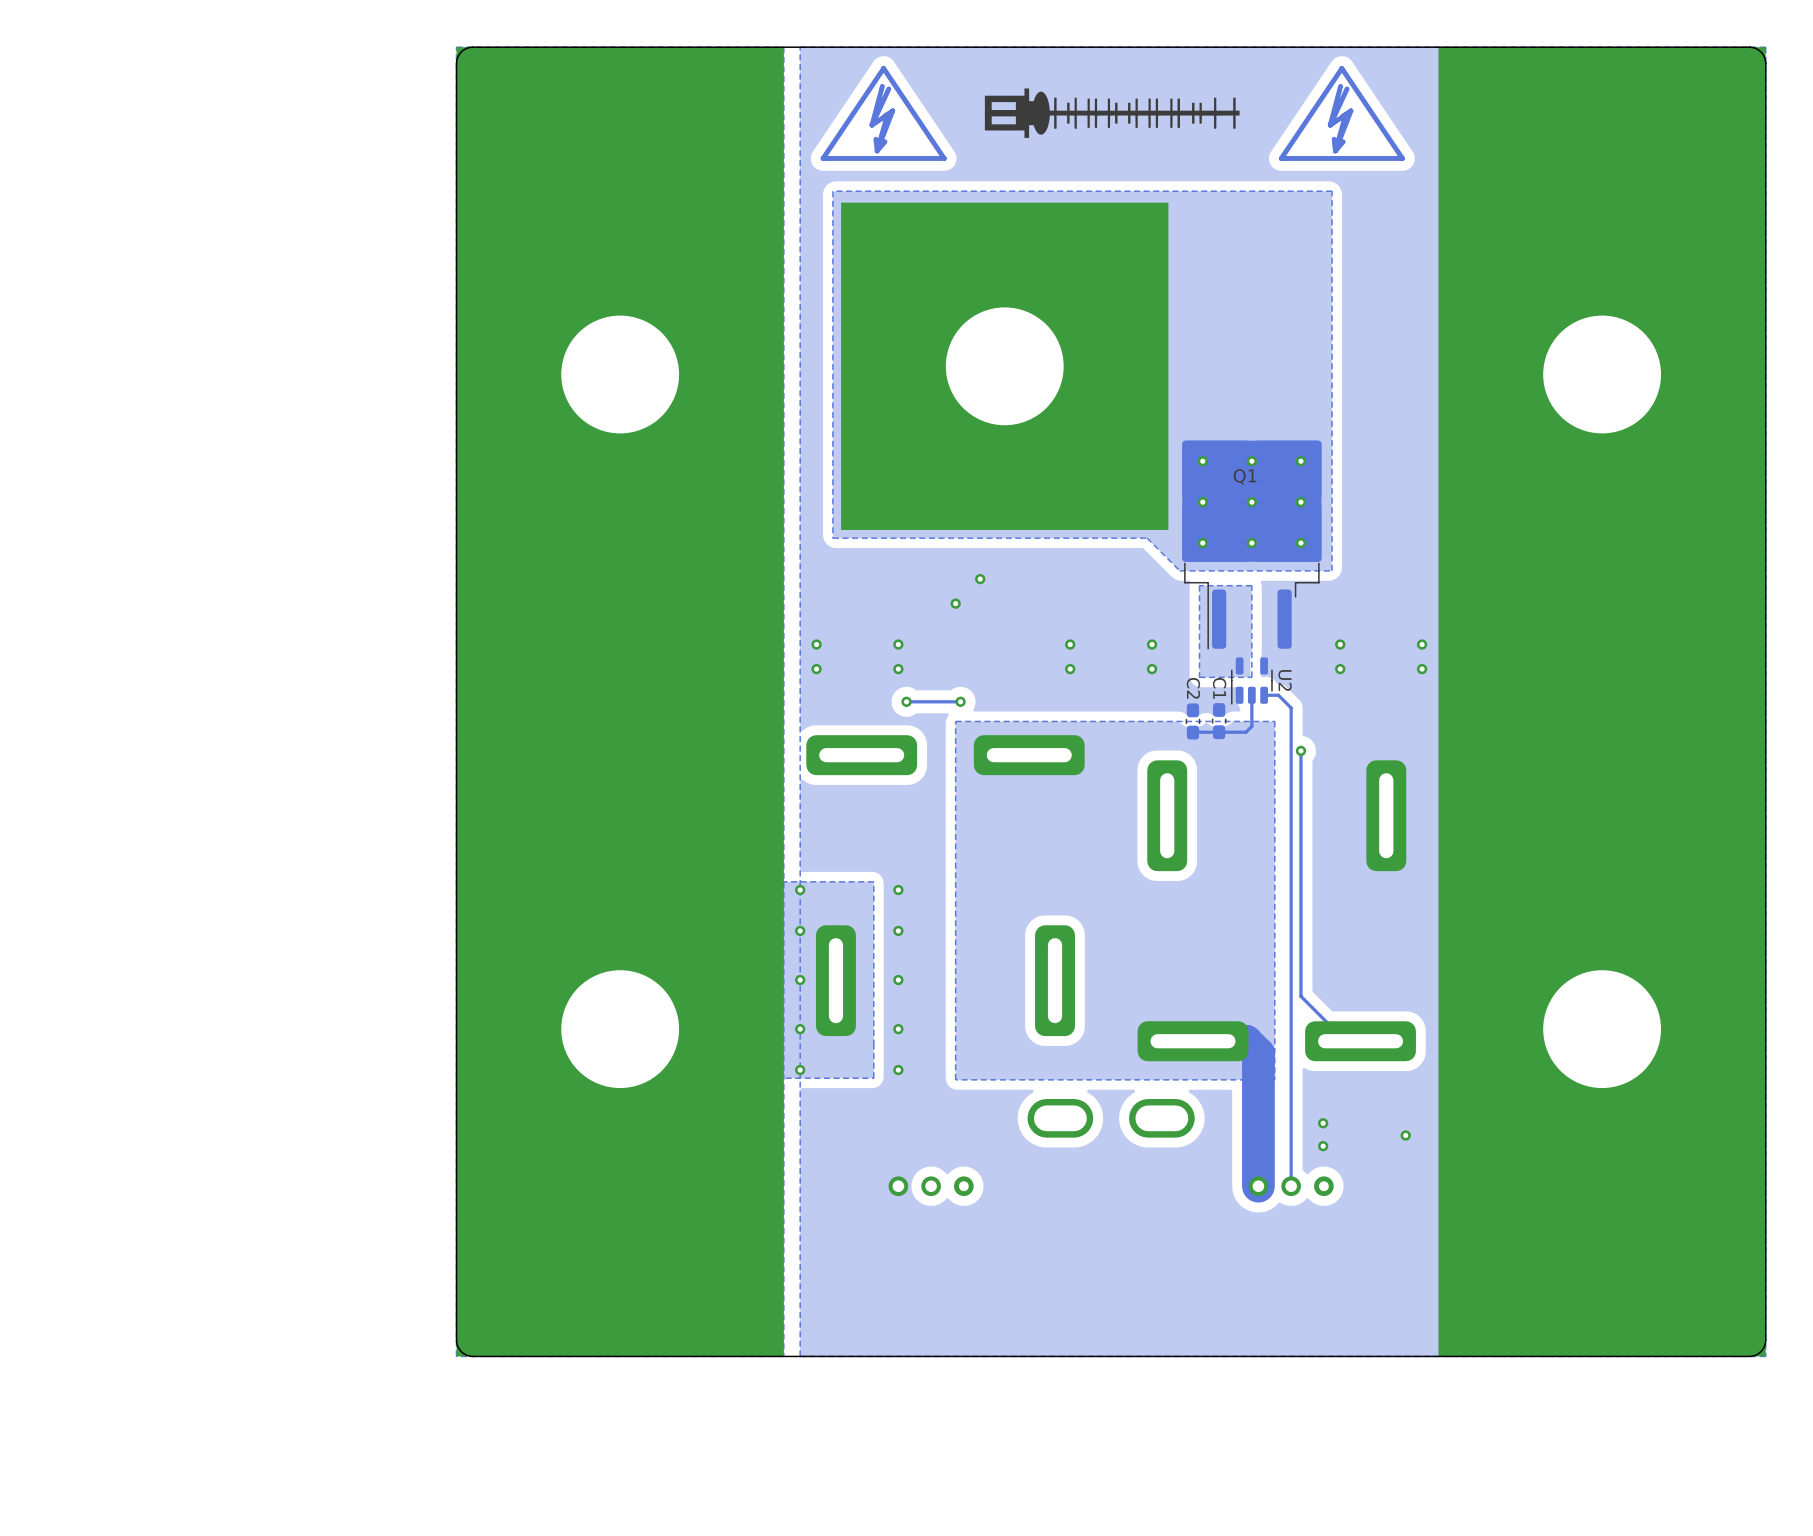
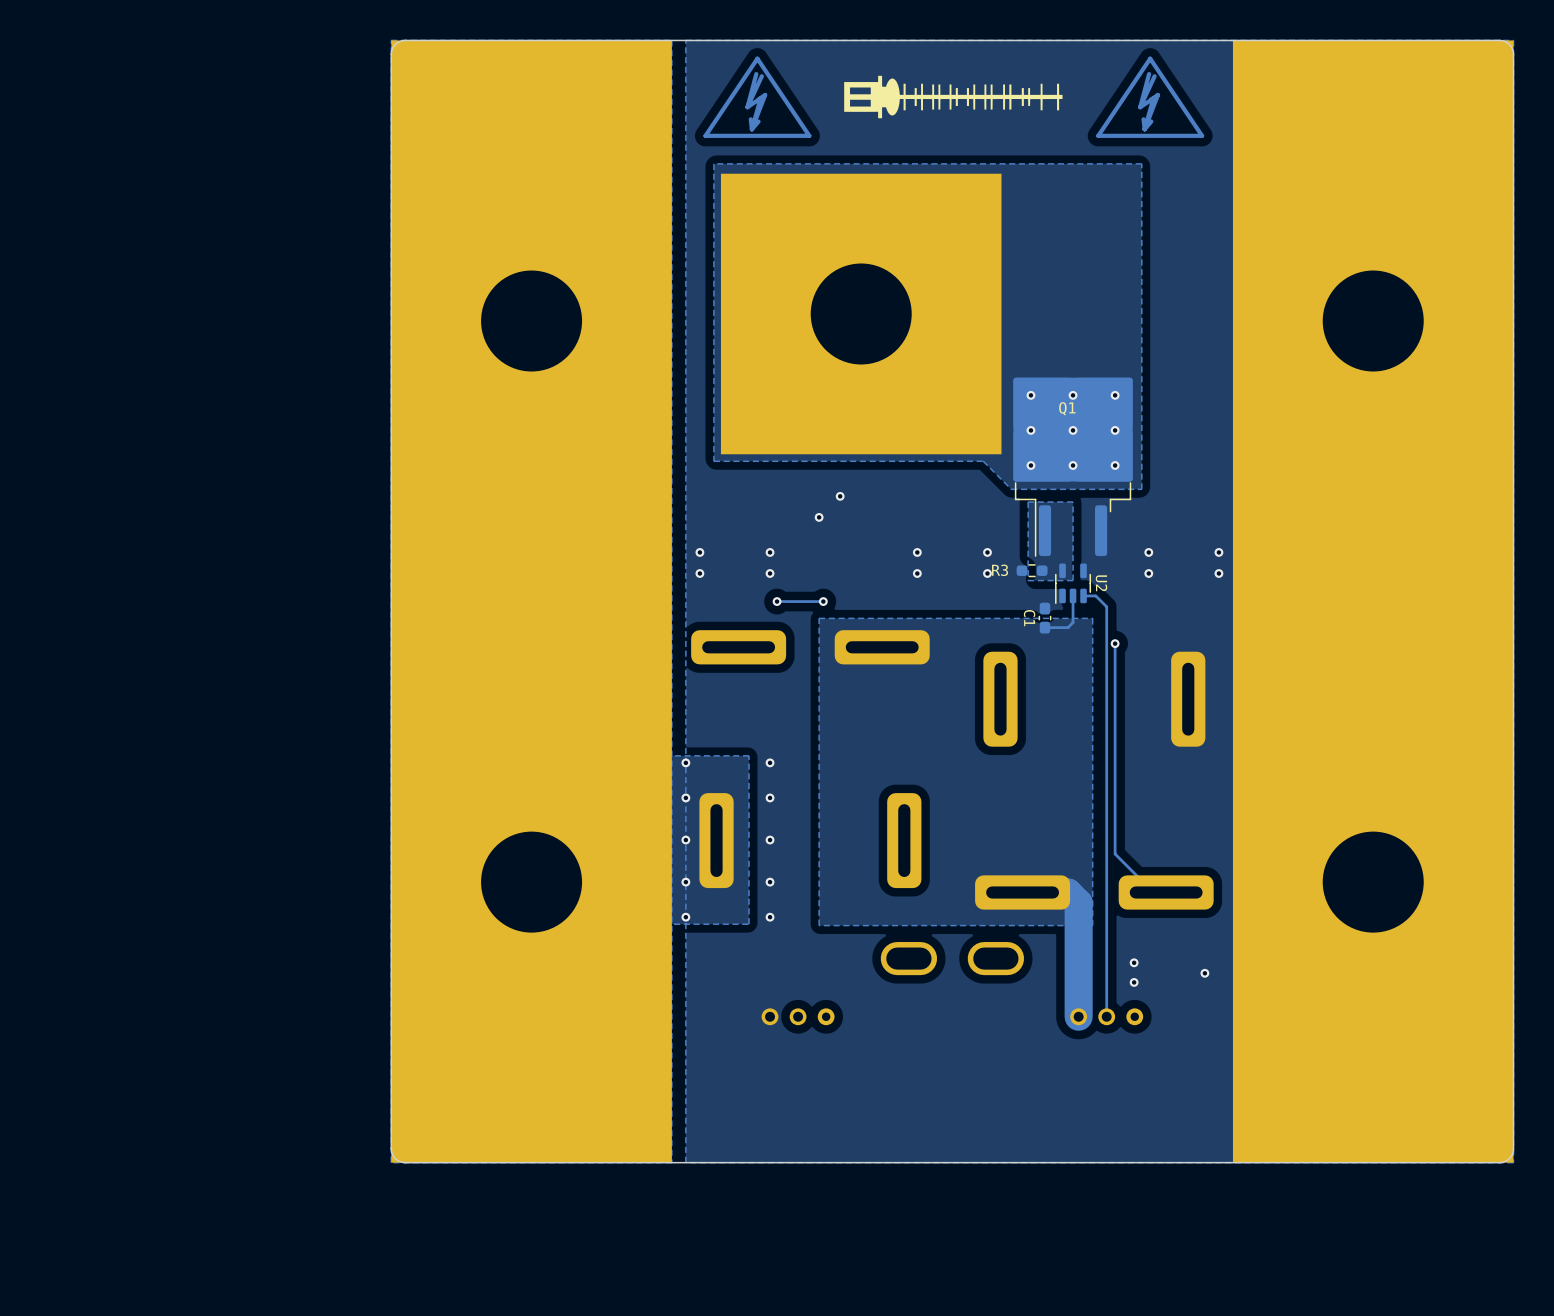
R3: none -> (1032, 570)
C1 name position: C1 (1219, 688) -> C1 (1029, 618)
C2: (1192, 721) -> none
track: (1217, 732) (1192, 732) -> none

